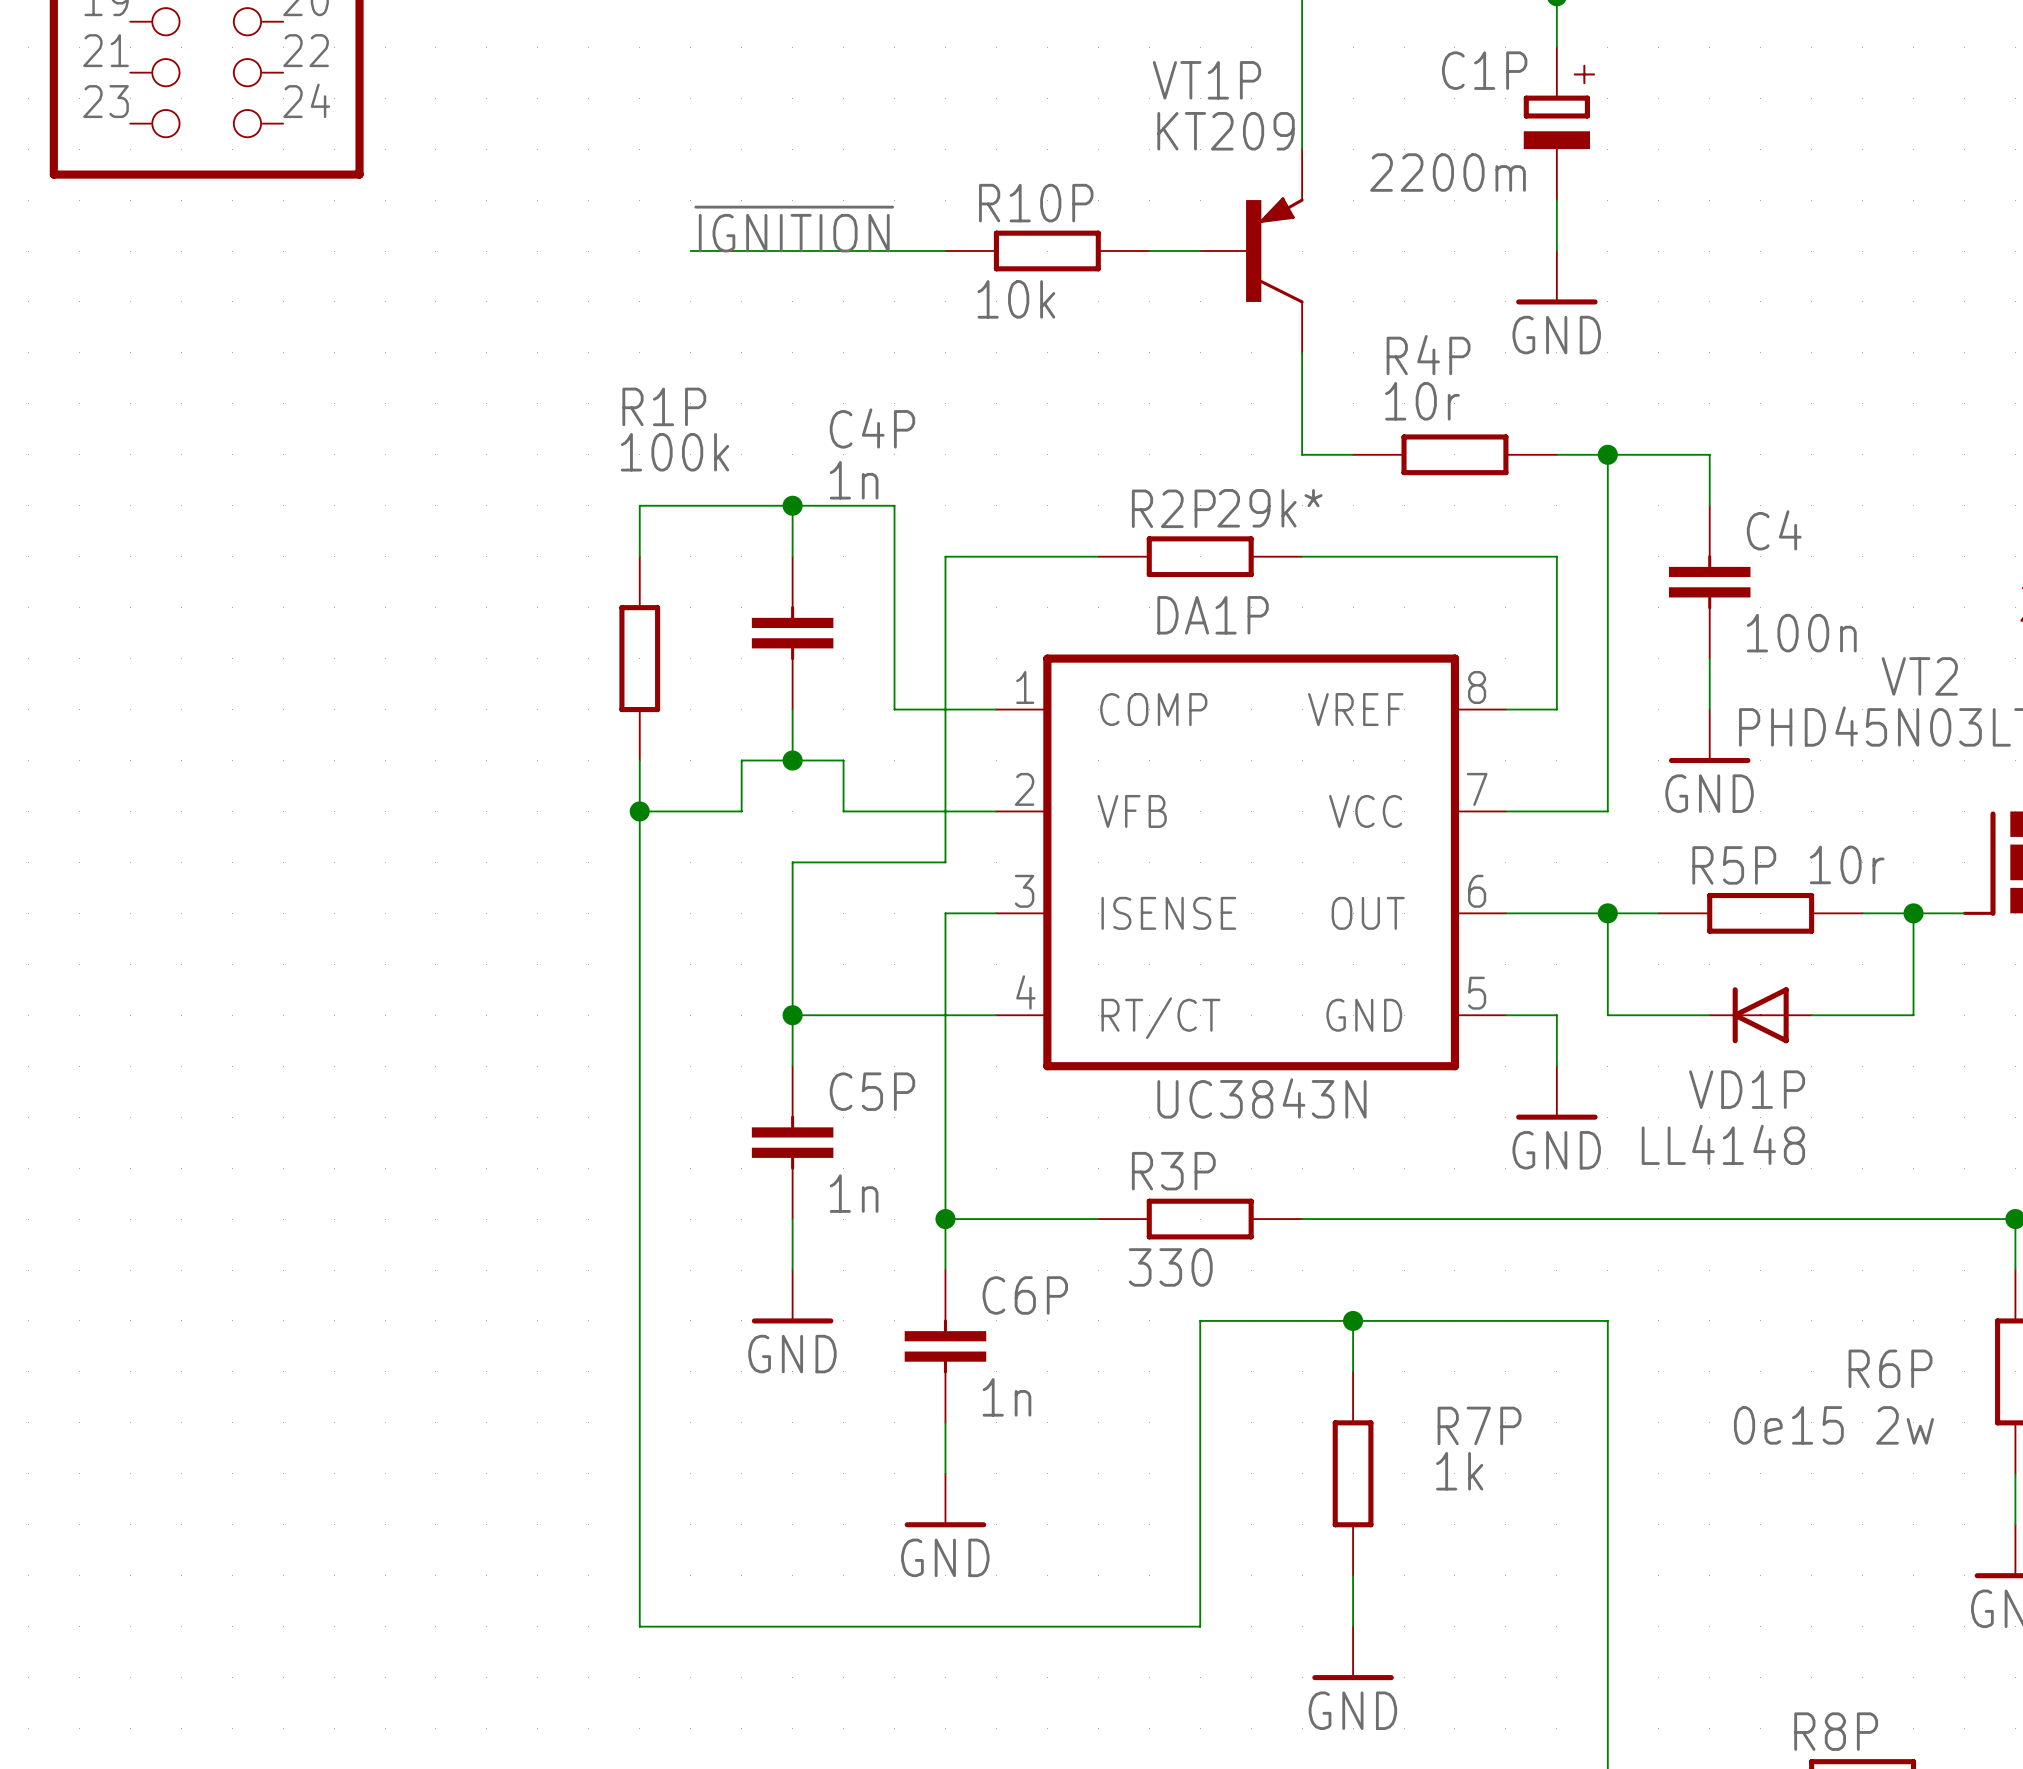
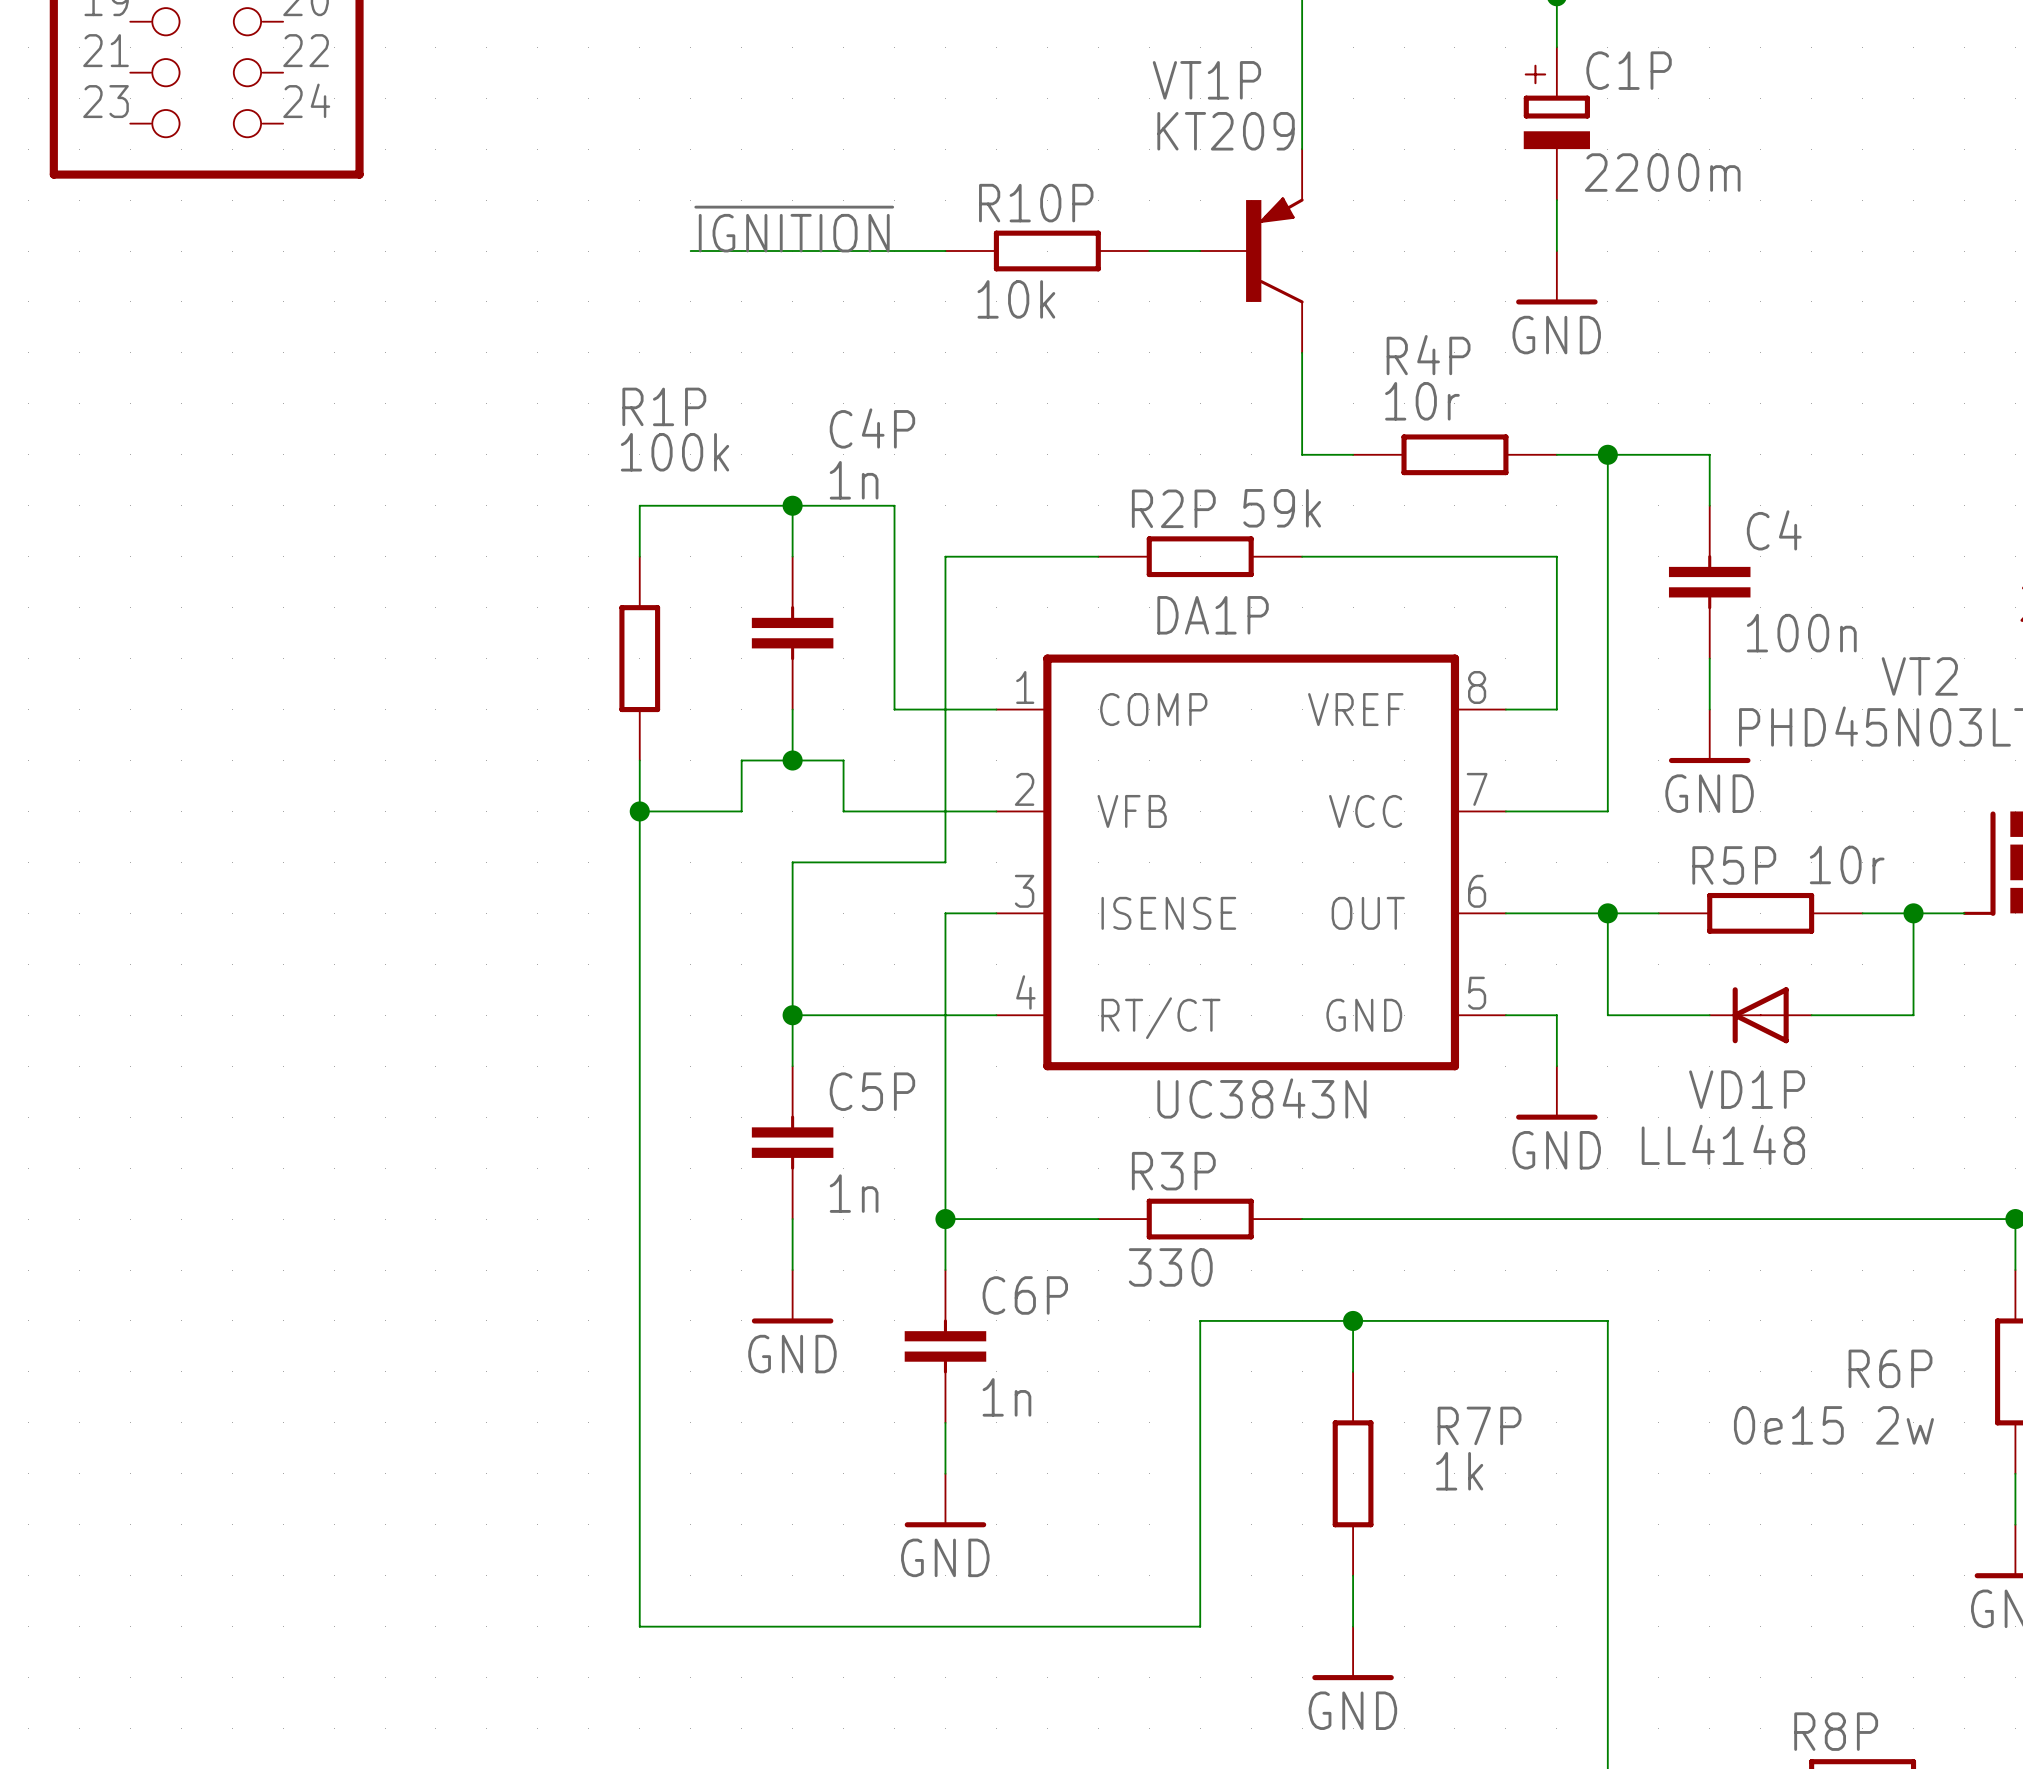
C1P name position: C1P (1484, 70) -> C1P (1629, 70)
C1P text position: + (1584, 74) -> + (1535, 74)
C1P value position: 2200m (1447, 172) -> 2200m (1662, 172)
R2P value: 29k* (1269, 508) -> 59k (1282, 508)

